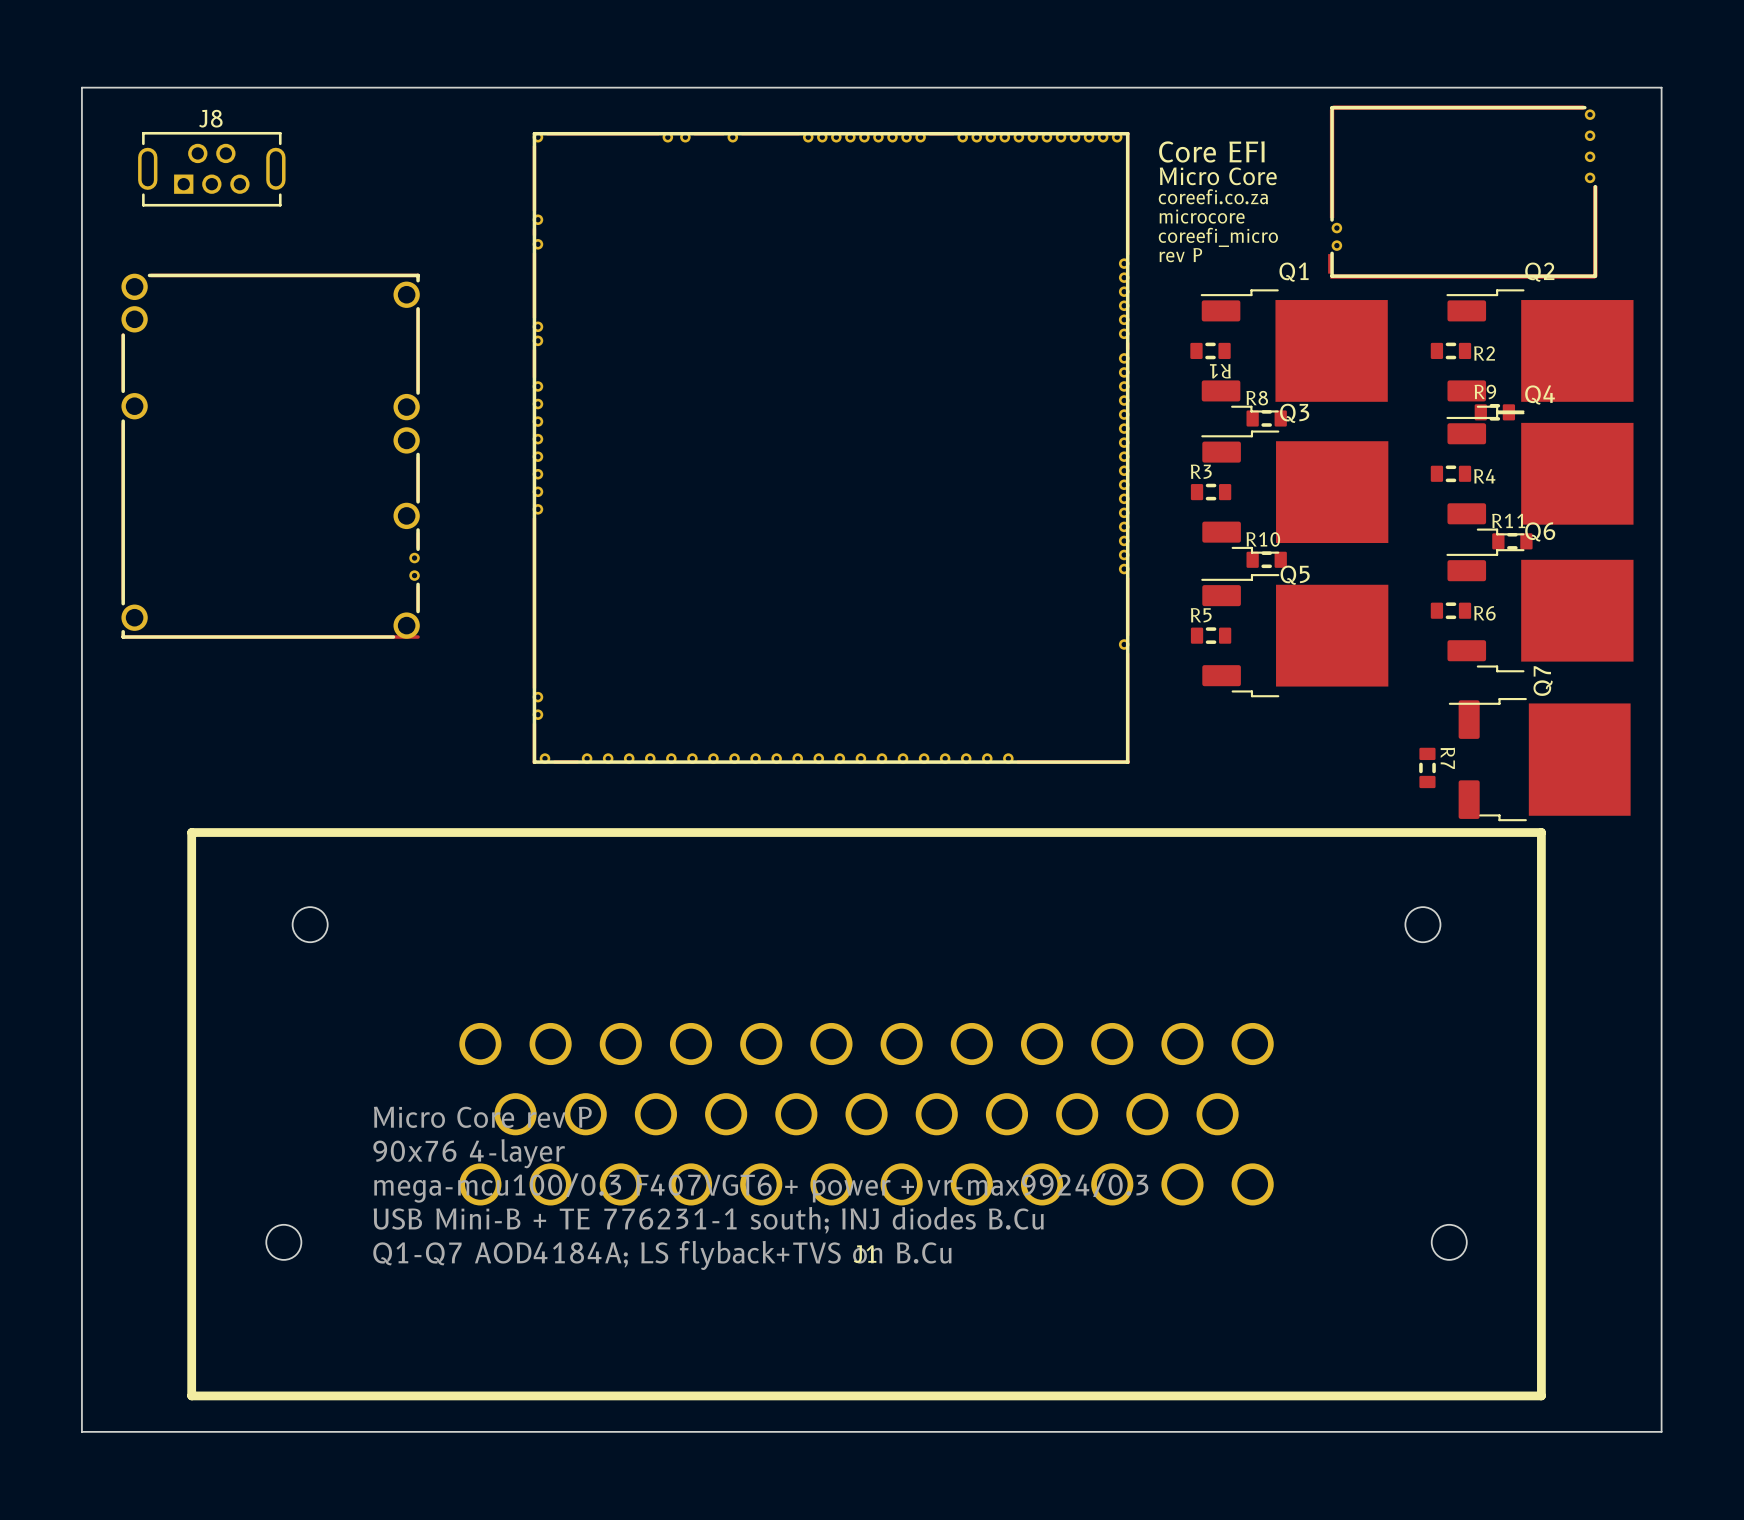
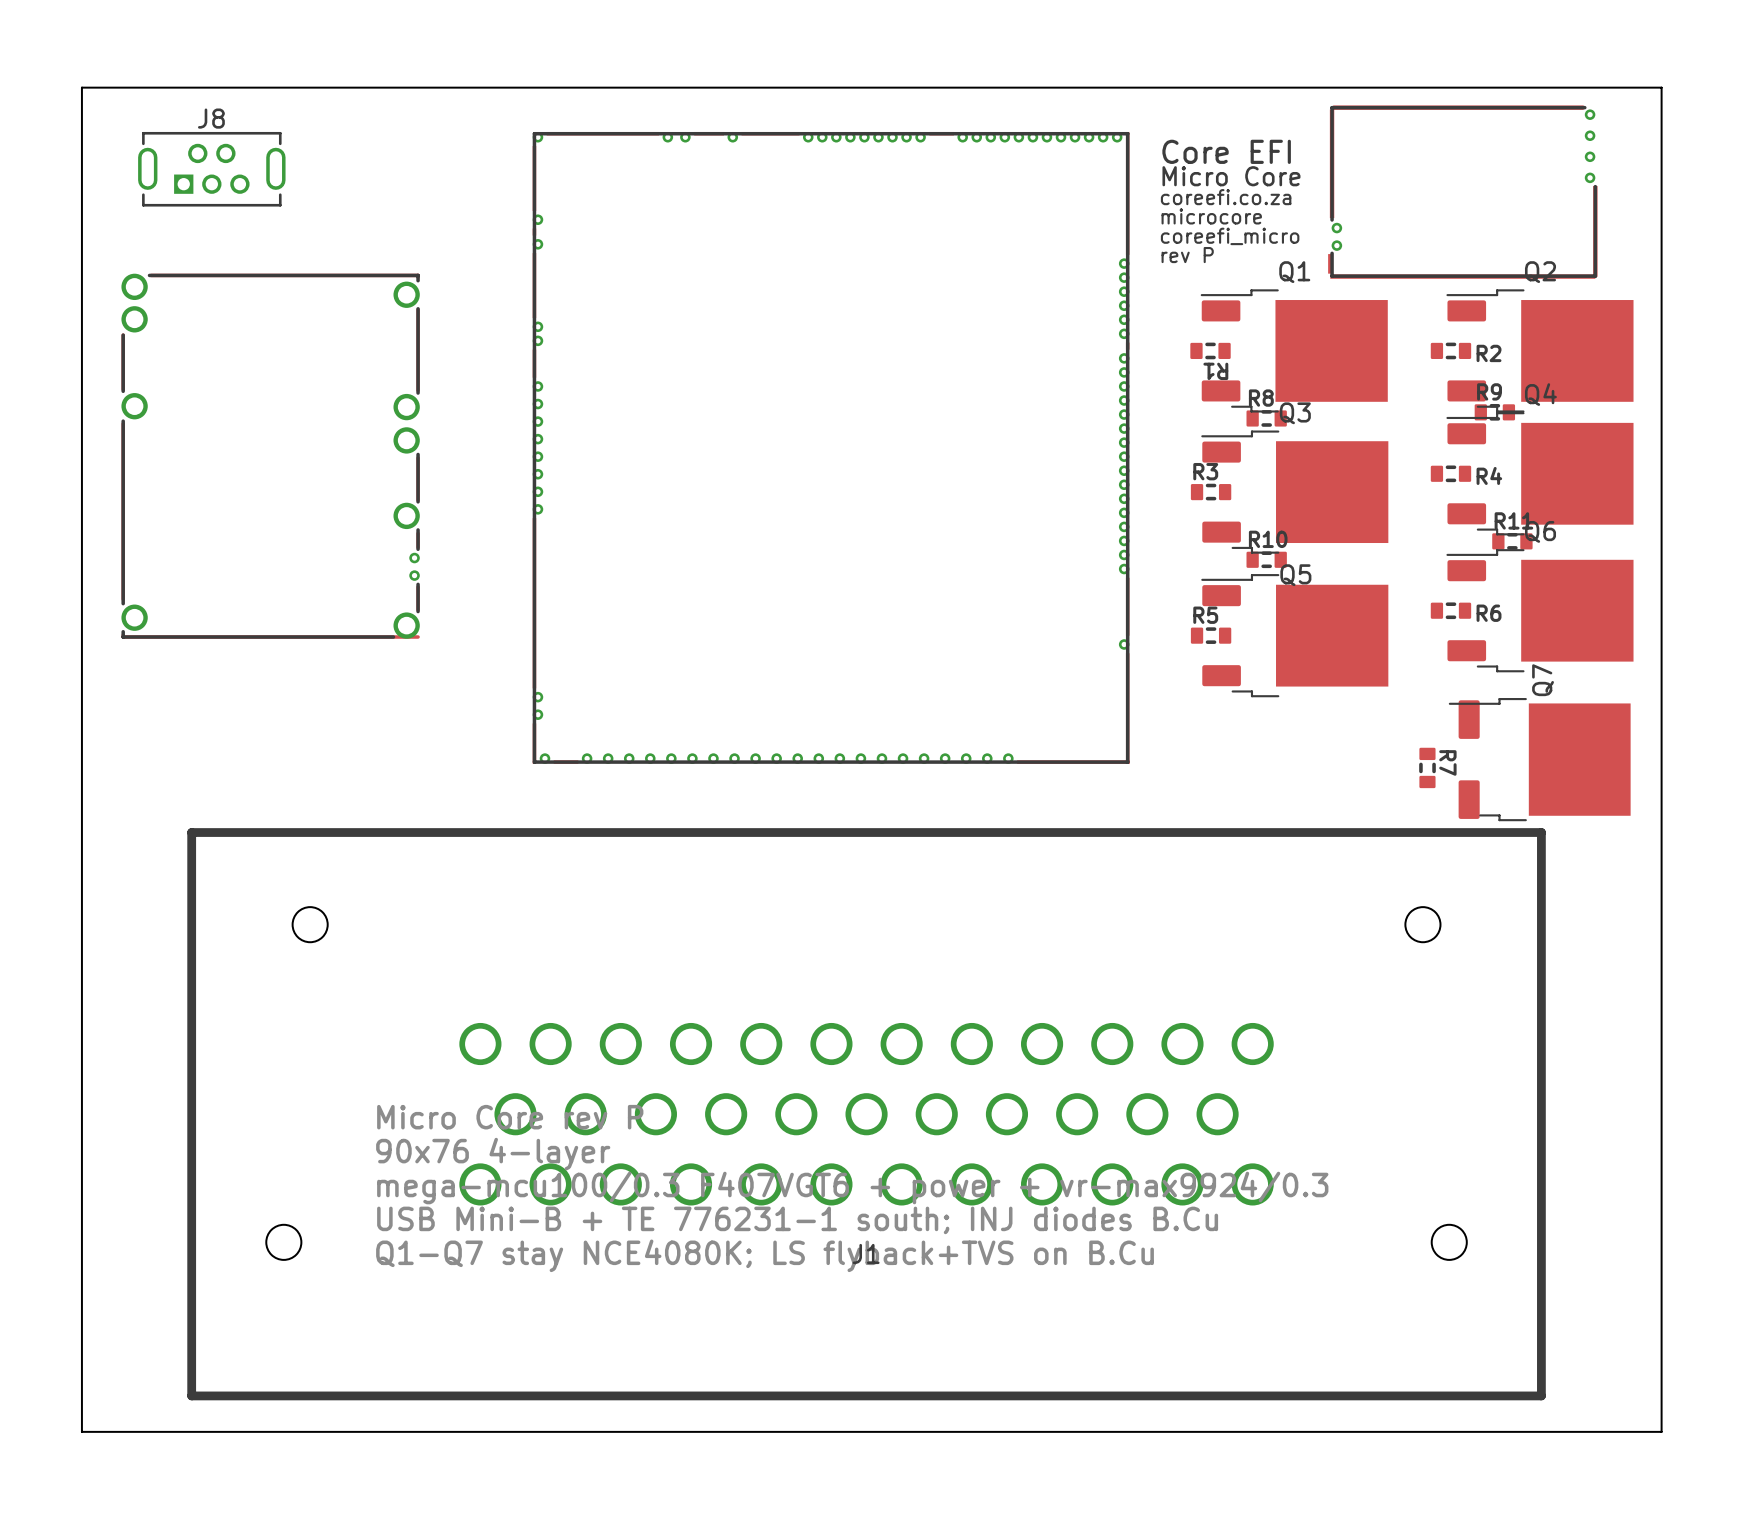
text: Q1-Q7 AOD4184A; LS flyback+TVS on B.Cu (662, 1255) -> Q1-Q7 stay NCE4080K; LS flyback+TVS on B.Cu (765, 1255)

